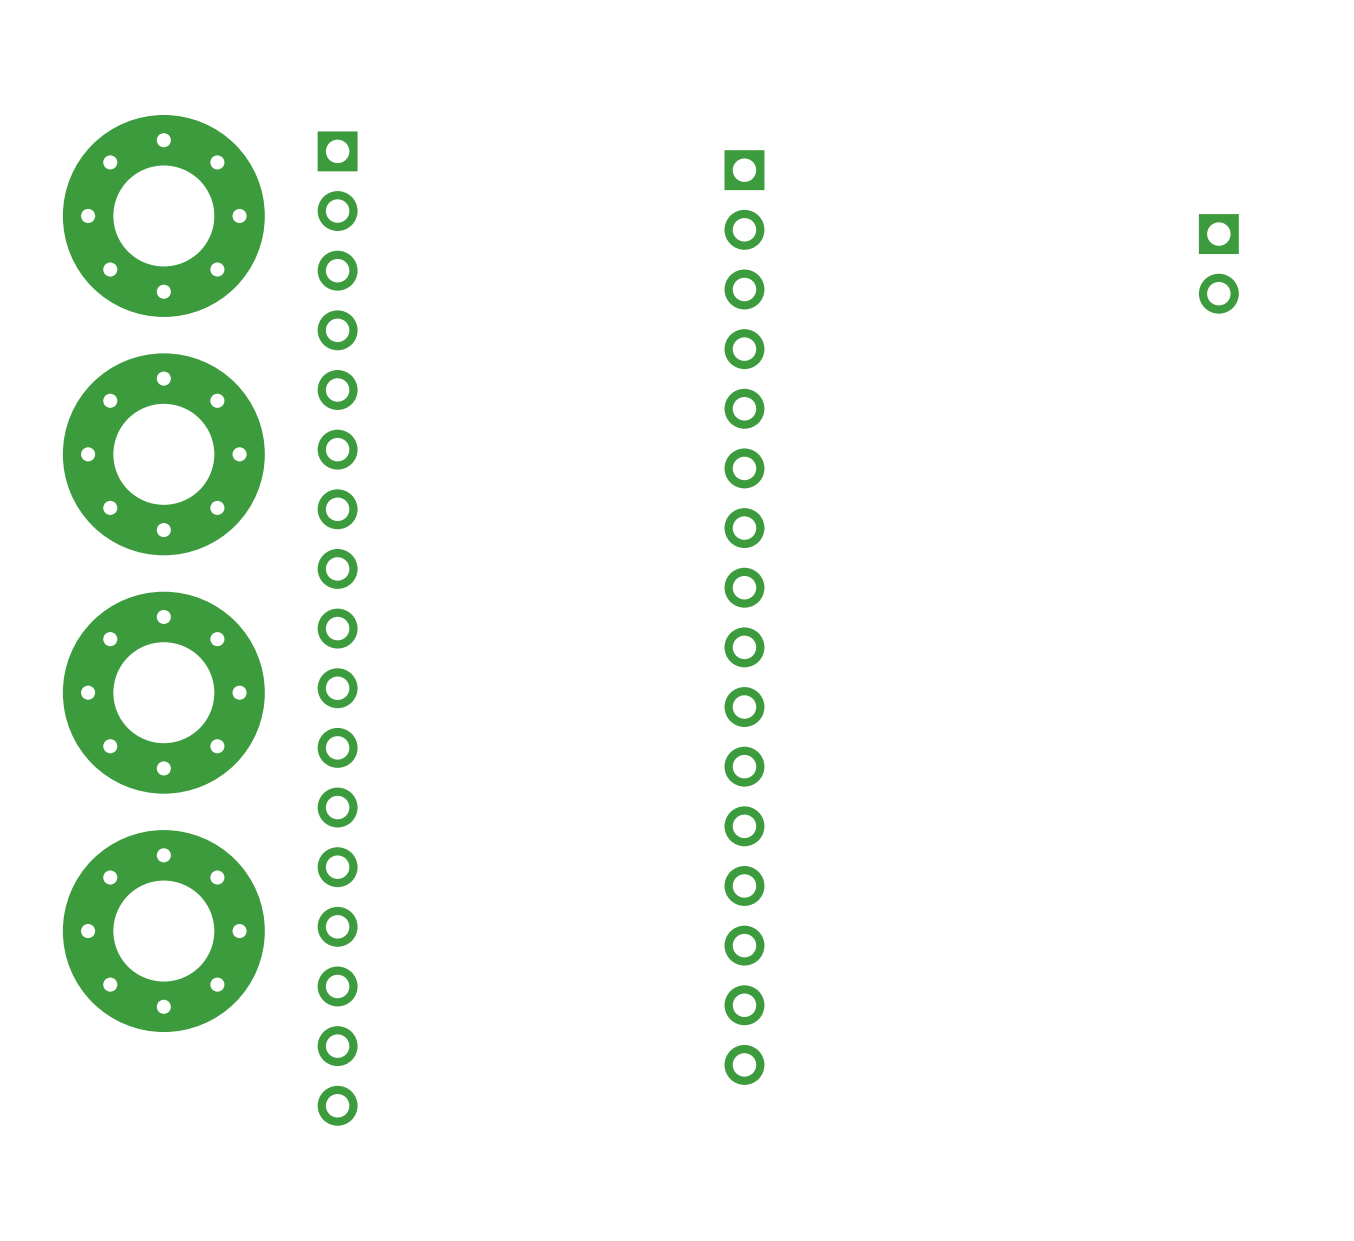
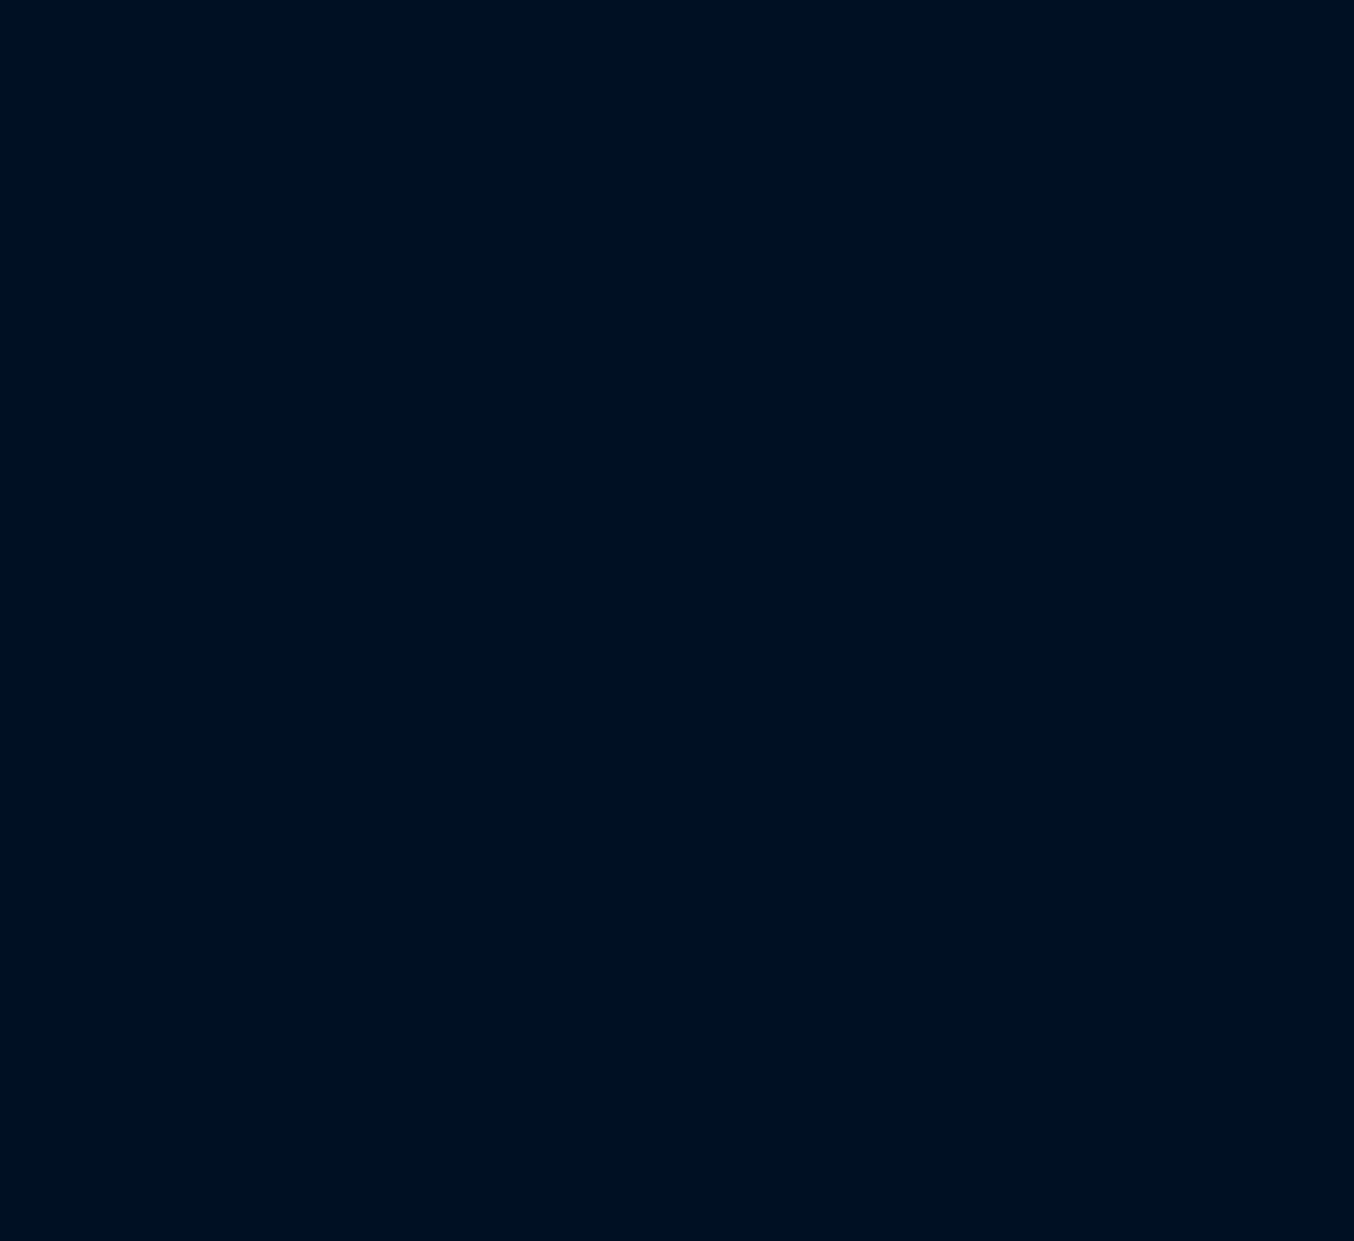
part: (163, 215) -> none
part: (1218, 263) -> none
part: (163, 454) -> none
part: (744, 617) -> none
part: (337, 628) -> none
part: (163, 692) -> none
part: (163, 931) -> none

